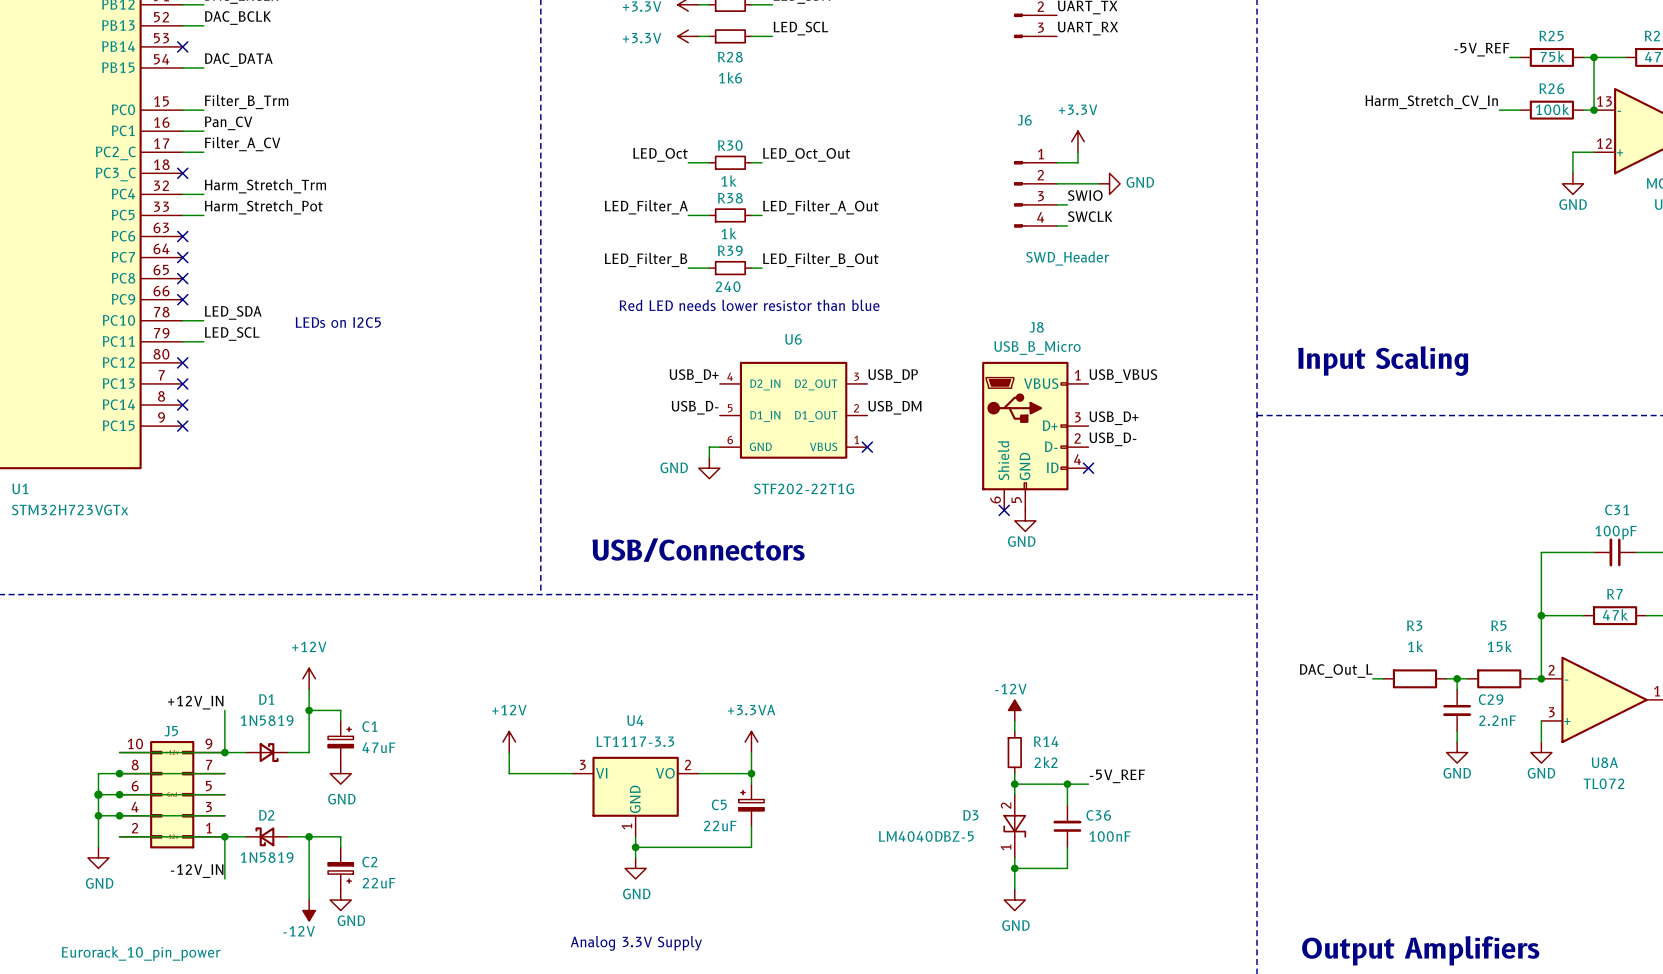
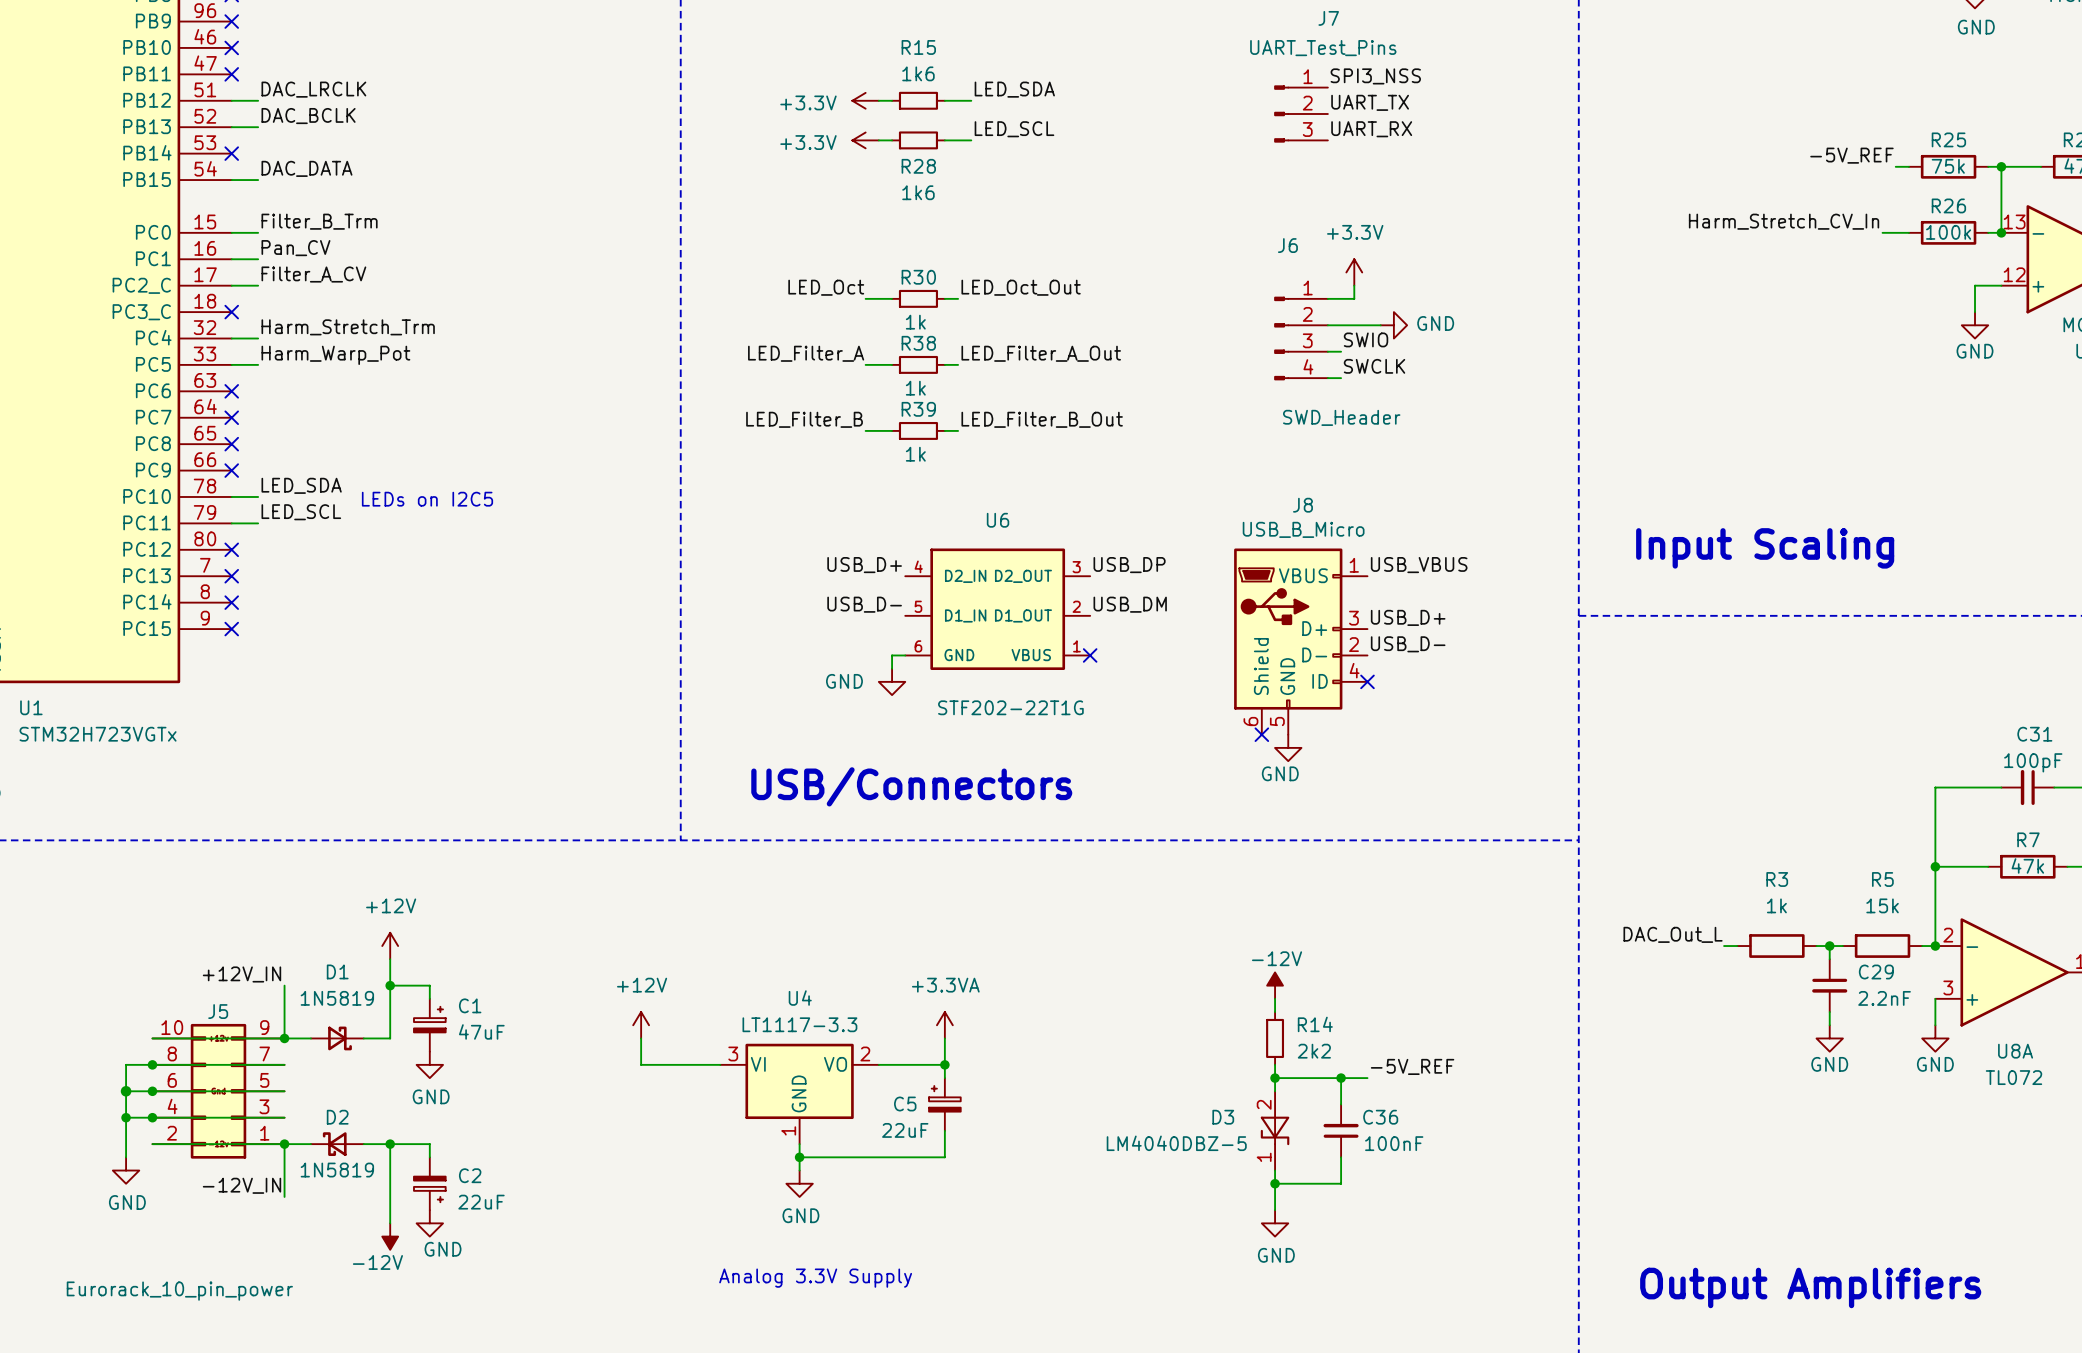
label: Harm_Stretch_Pot (263, 207) -> Harm_Warp_Pot (335, 355)
R39 value: 240 (728, 286) -> 1k (915, 454)
text: Red LED needs lower resistor than blue (749, 305) -> none

